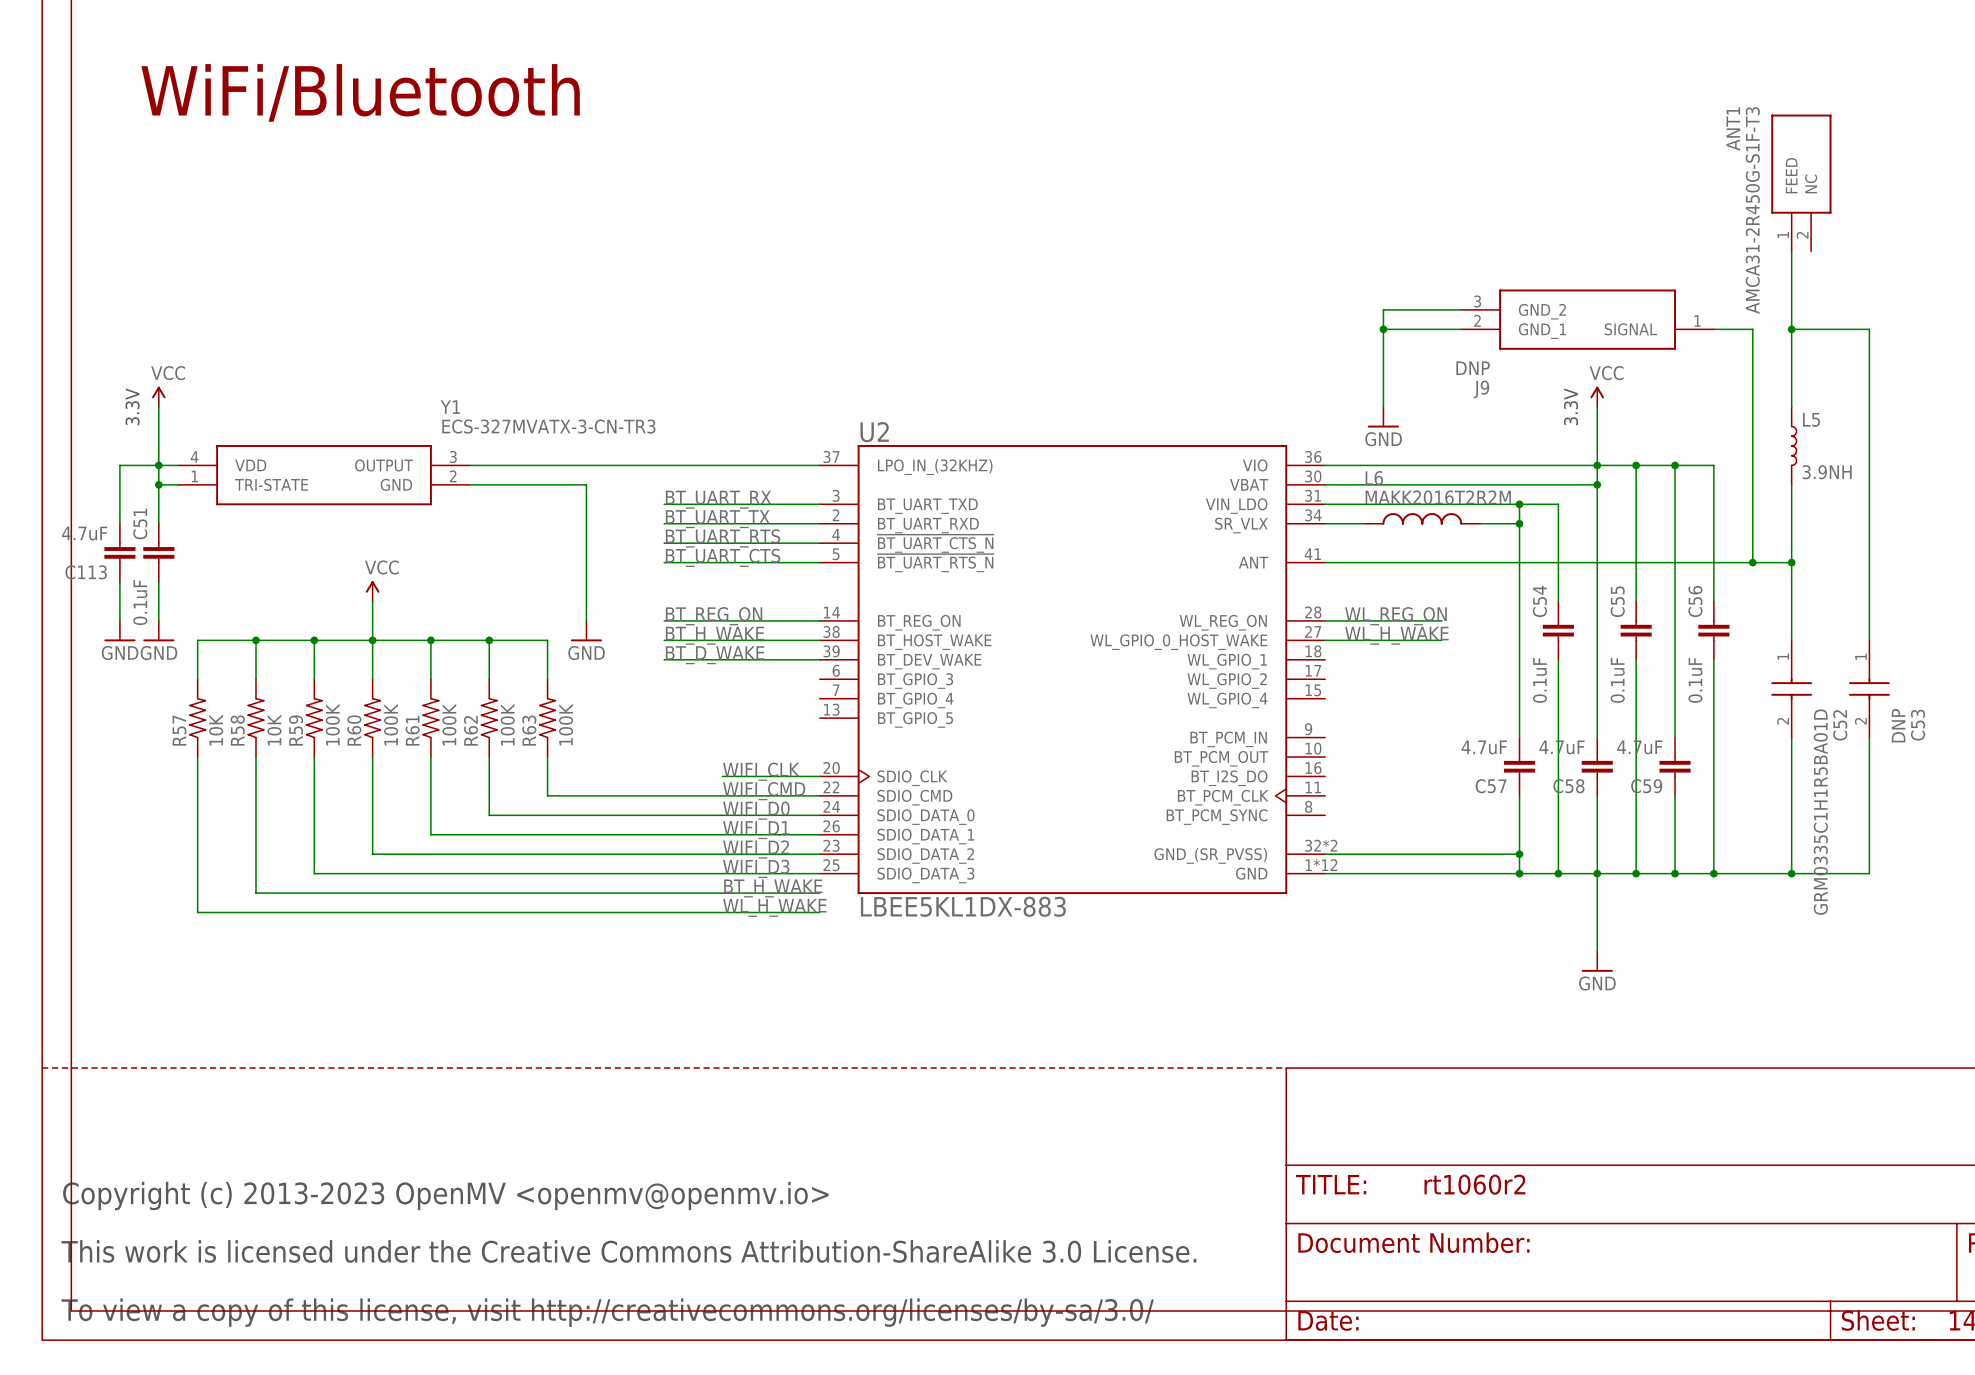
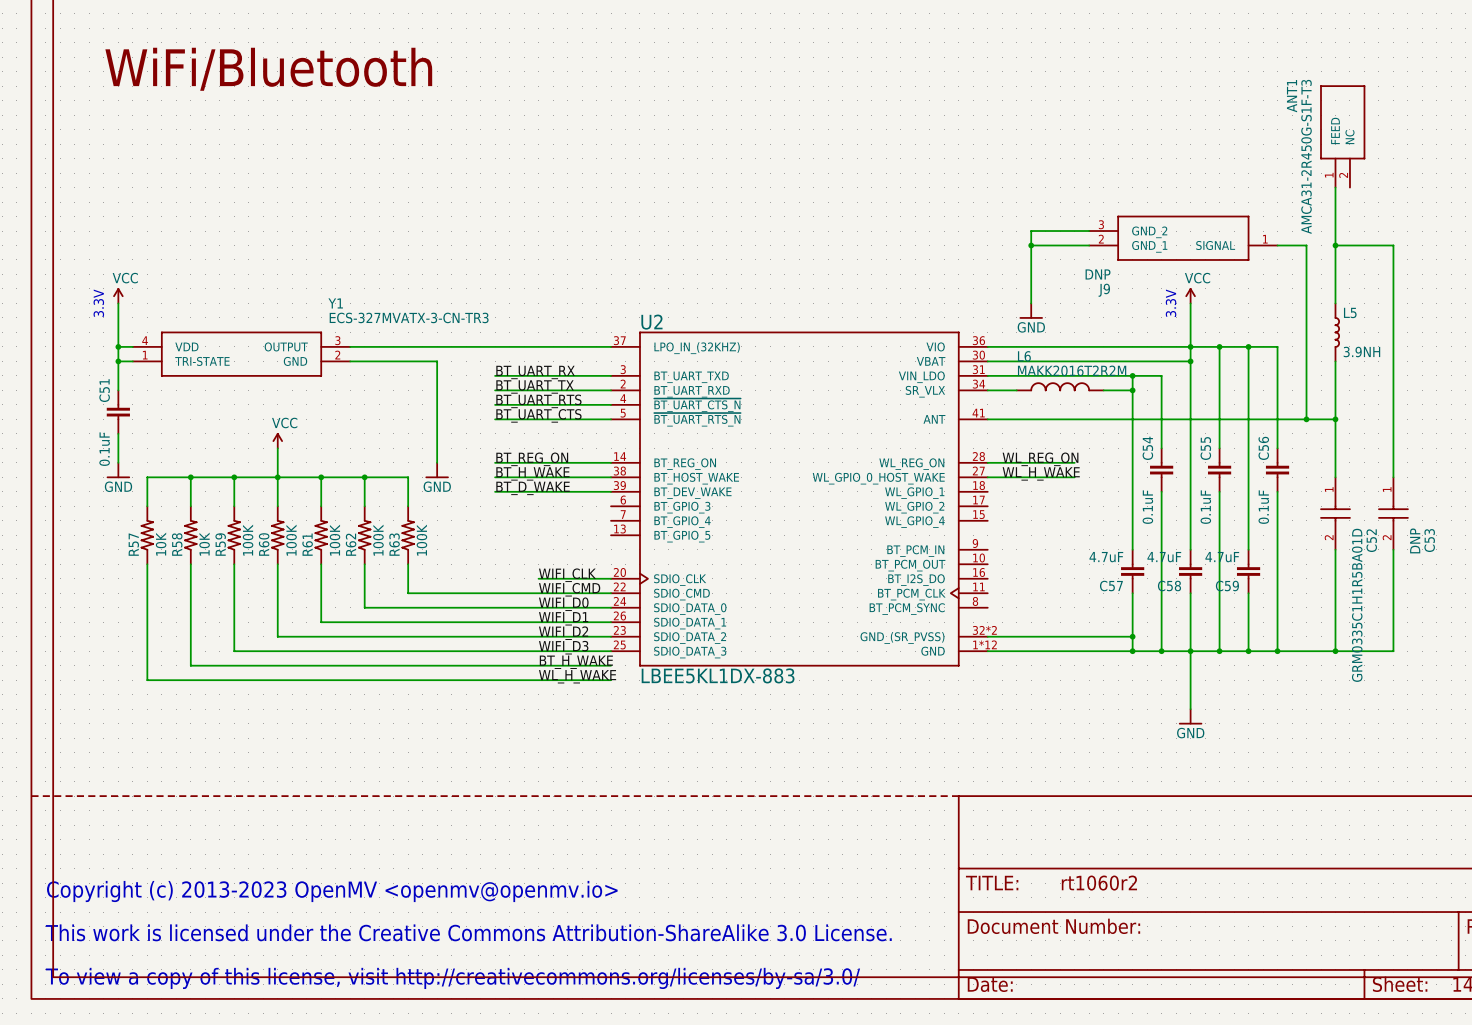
wire: (158, 465) (119, 465) (119, 523) -> none
C113: 4.7uF (119, 552) -> none
wire: (119, 582) (119, 620) -> none
power symbol: GND (119, 631) -> none

